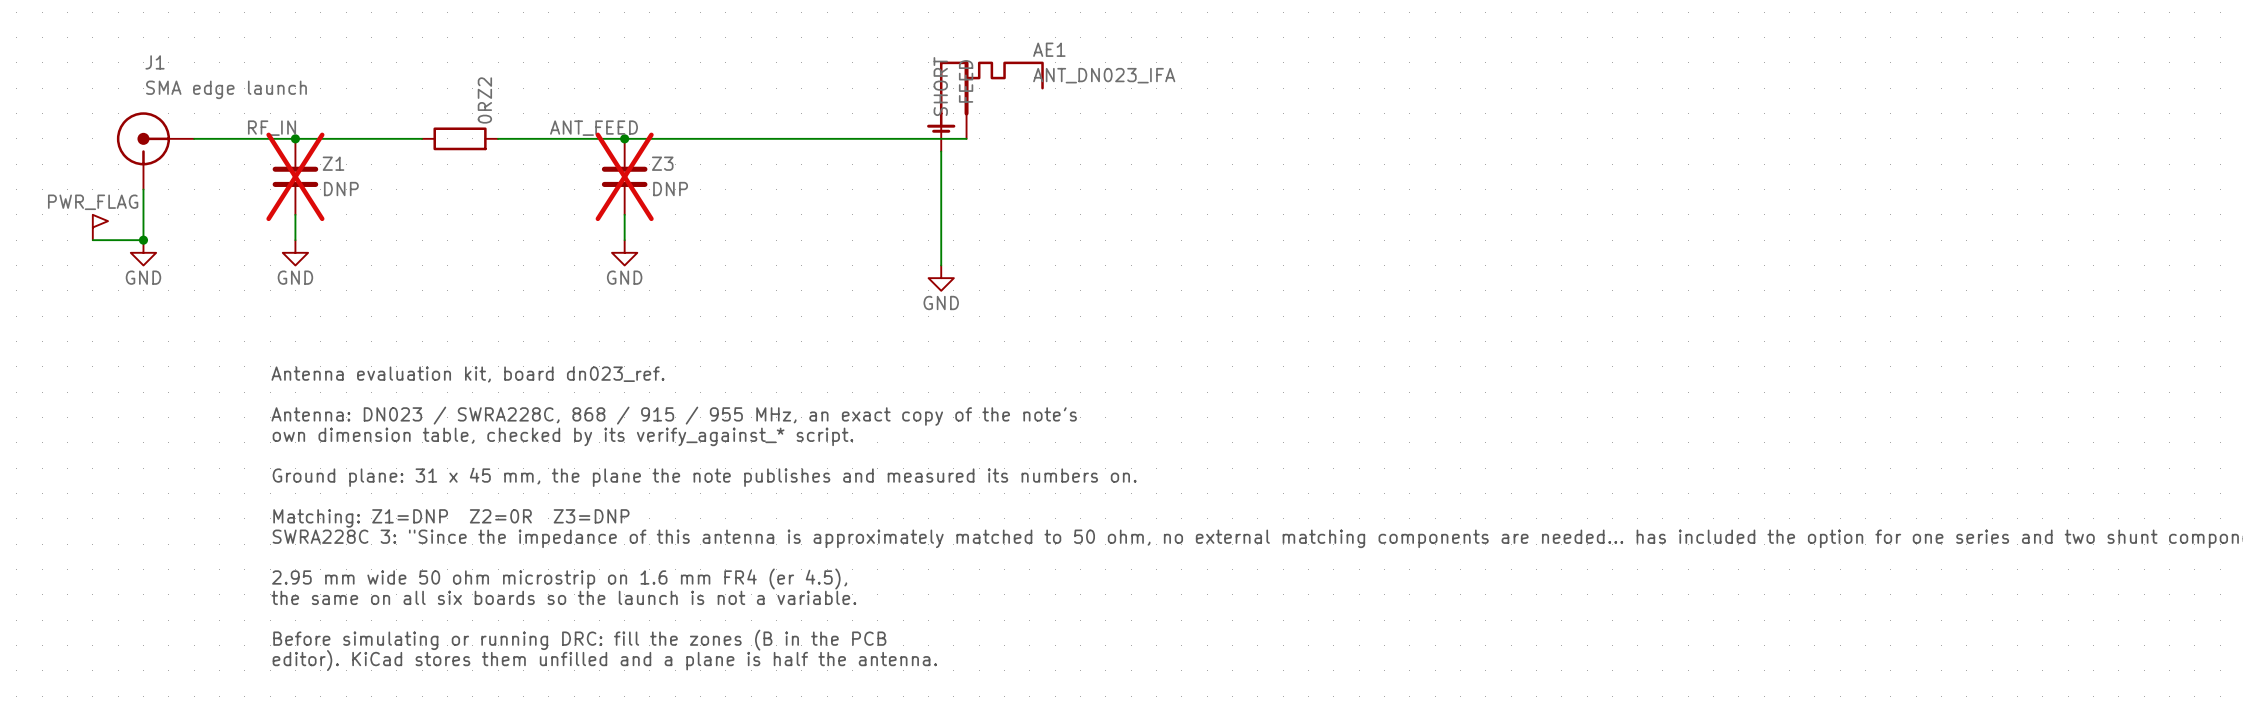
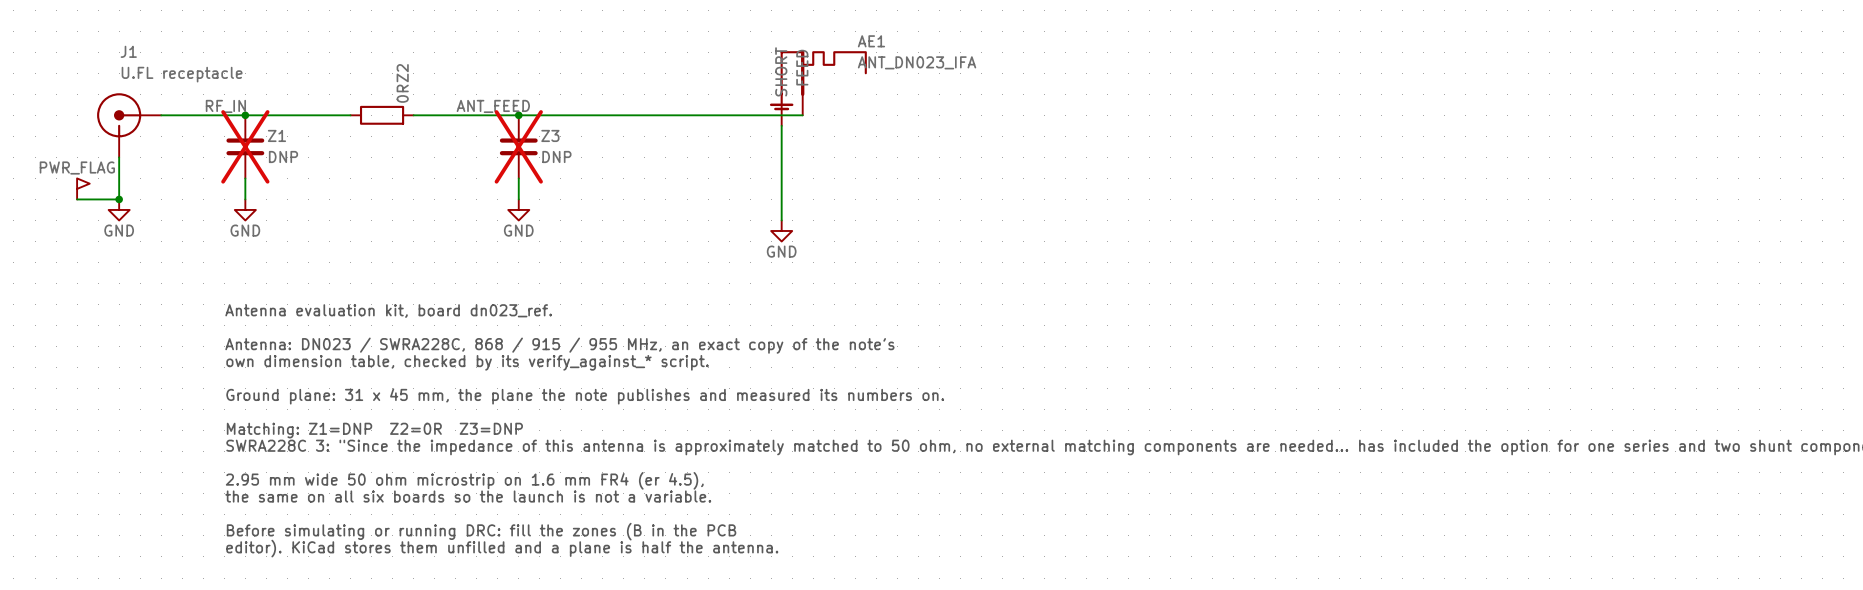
J1 value: SMA edge launch (226, 89) -> U.FL receptacle (182, 74)

